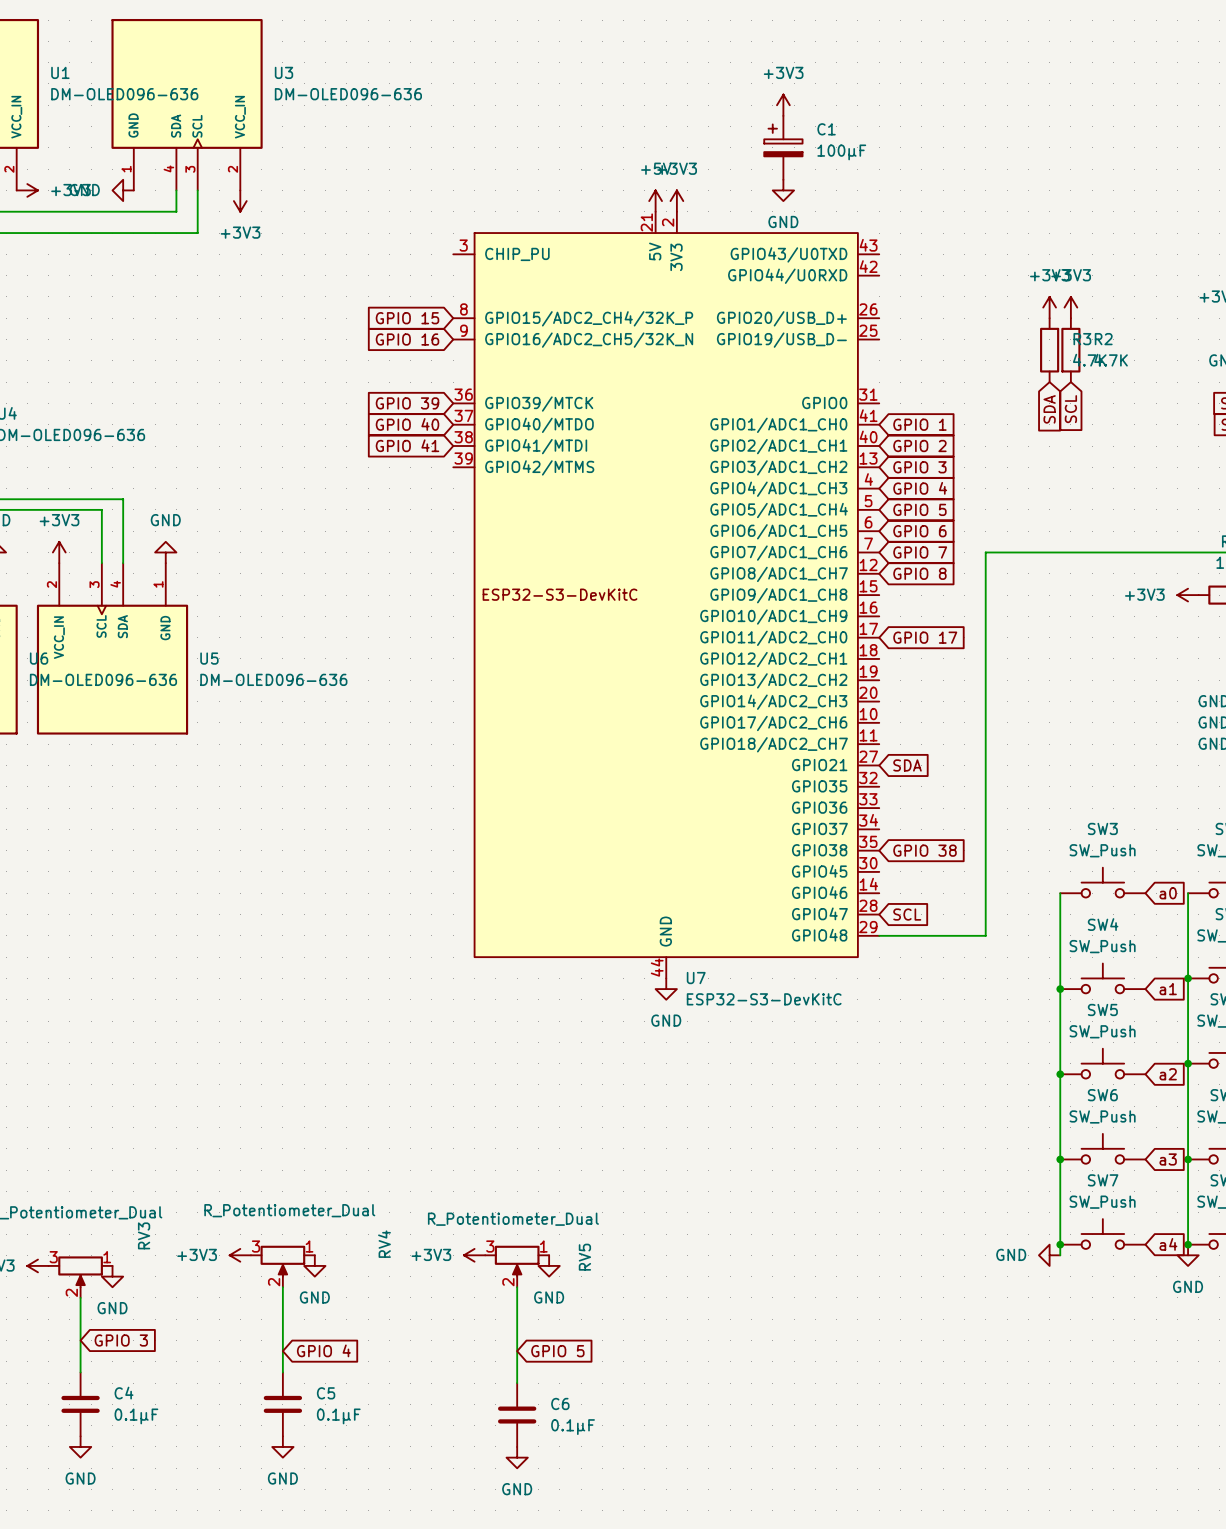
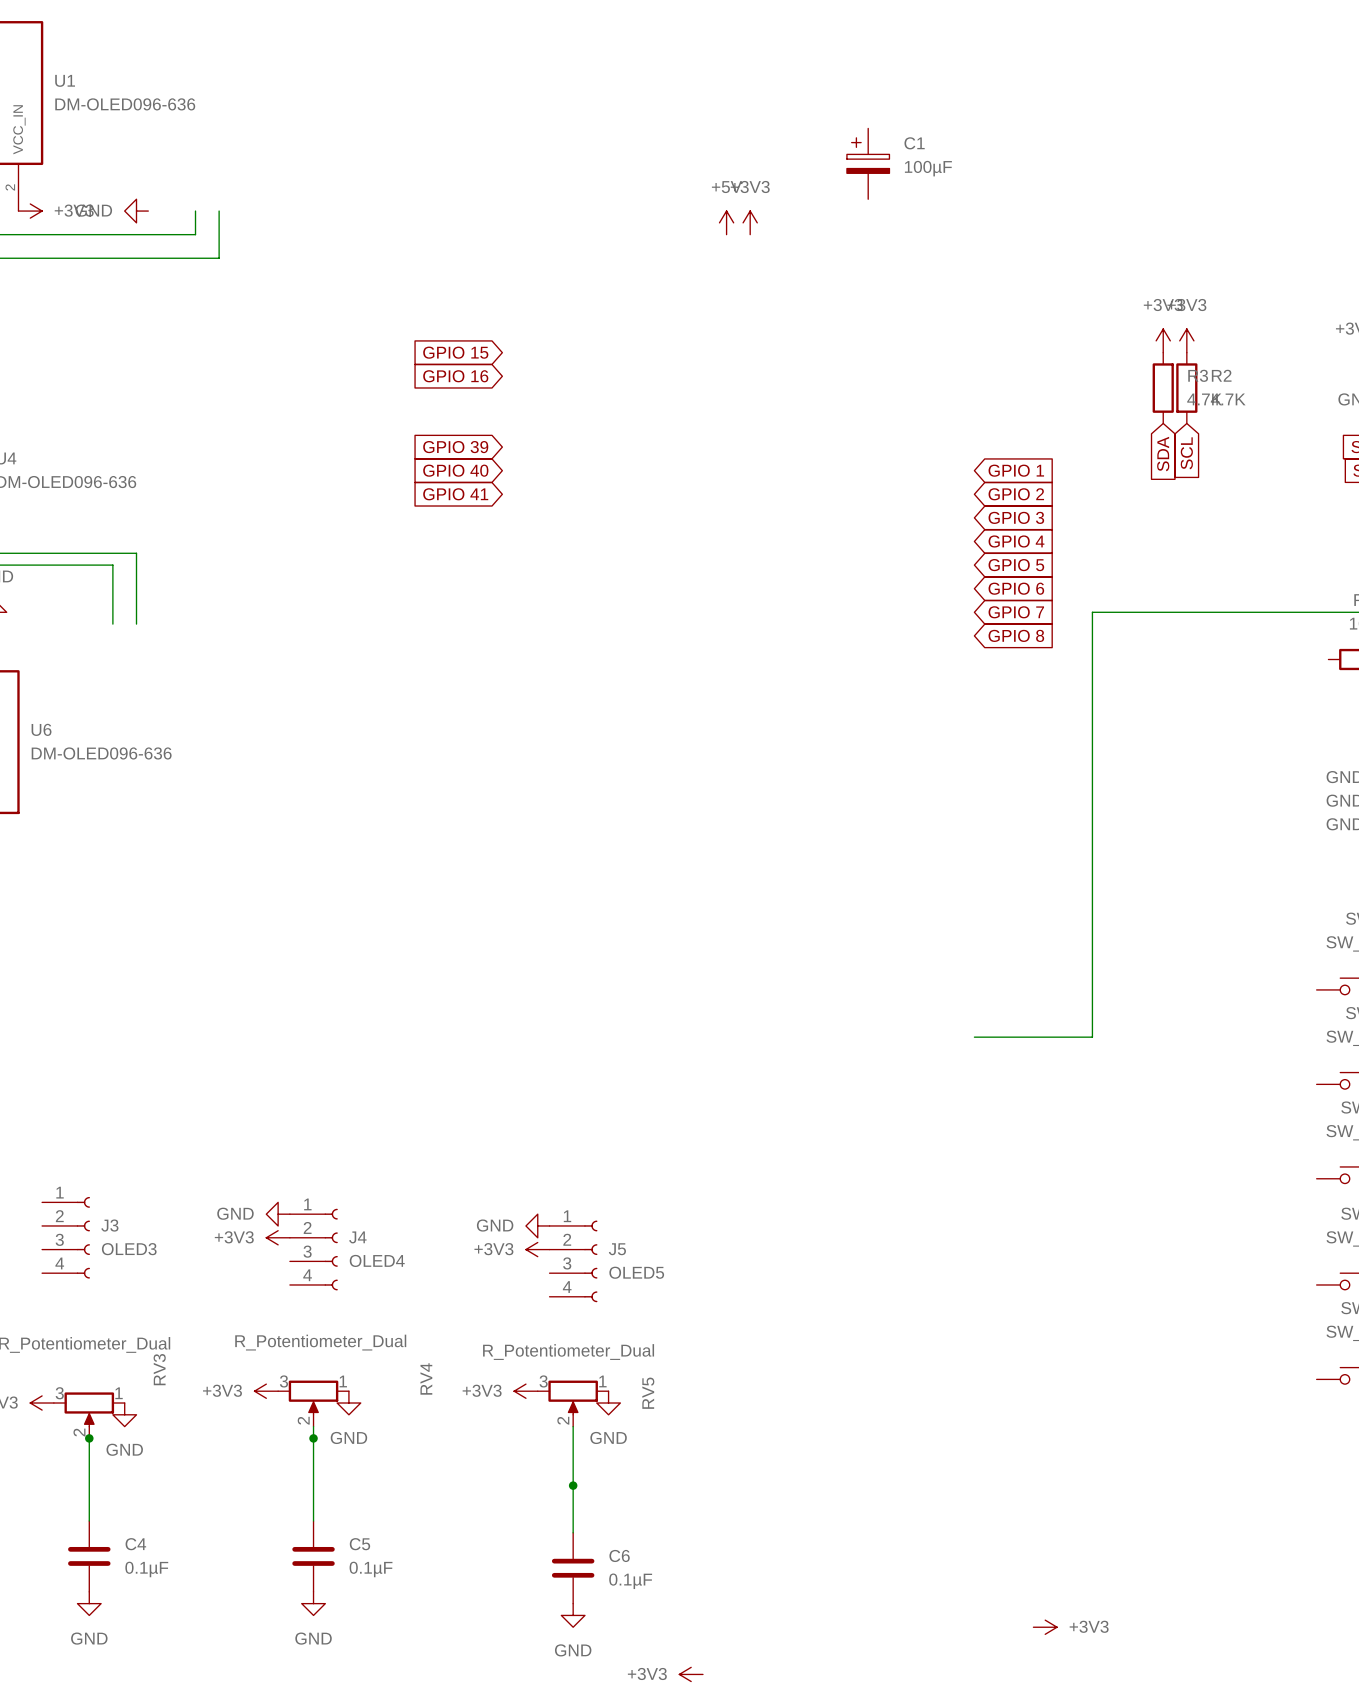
U3: DM-OLED096-636 (187, 104) -> none
power symbol: +3V3 (783, 105) -> none
power symbol: GND (783, 190) -> none
power symbol: +3V3 (240, 201) -> none
power symbol: +3V3 (59, 552) -> none
power symbol: GND (165, 552) -> none
U7: ESP32-S3-DevKitC (666, 595) -> none
power symbol: +3V3 (1188, 595) -> none
global label: GPIO 17 (925, 637) -> none
U5: DM-OLED096-636 (112, 648) -> none
global label: SDA (907, 765) -> none
global label: GPIO 38 (925, 850) -> none
SW3: SW_Push (1102, 882) -> none
wire: (1060, 893) (1060, 1255) -> none
global label: a0 (1168, 893) -> none
wire: (1188, 893) (1188, 1244) -> none
global label: SCL (907, 914) -> none
SW4: SW_Push (1102, 978) -> none
junction: (1188, 978) -> none
power symbol: GND (666, 989) -> none
junction: (1060, 989) -> none
global label: a1 (1168, 989) -> none
SW5: SW_Push (1102, 1063) -> none
junction: (1188, 1063) -> none
junction: (1060, 1074) -> none
global label: a2 (1168, 1074) -> none
power symbol: none -> GND (278, 1214)
power symbol: none -> GND (537, 1225)
J3: none -> OLED3 (66, 1237)
power symbol: none -> +3V3 (278, 1237)
J4: none -> OLED4 (313, 1249)
power symbol: none -> +3V3 (537, 1249)
J5: none -> OLED5 (573, 1261)
SW6: SW_Push (1102, 1148) -> none
junction: (1060, 1159) -> none
global label: a3 (1168, 1159) -> none
junction: (1188, 1159) -> none
SW7: SW_Push (1102, 1234) -> none
junction: (1060, 1244) -> none
global label: a4 (1168, 1244) -> none
junction: (1188, 1244) -> none
power symbol: GND (1049, 1255) -> none
power symbol: GND (1188, 1255) -> none
junction: none -> (89, 1438)
junction: none -> (313, 1438)
global label: GPIO 3 (121, 1340) -> none
junction: none -> (573, 1485)
global label: GPIO 4 (323, 1350) -> none
global label: GPIO 5 (557, 1351) -> none
power symbol: none -> +3V3 (1045, 1627)
power symbol: none -> +3V3 (691, 1674)

